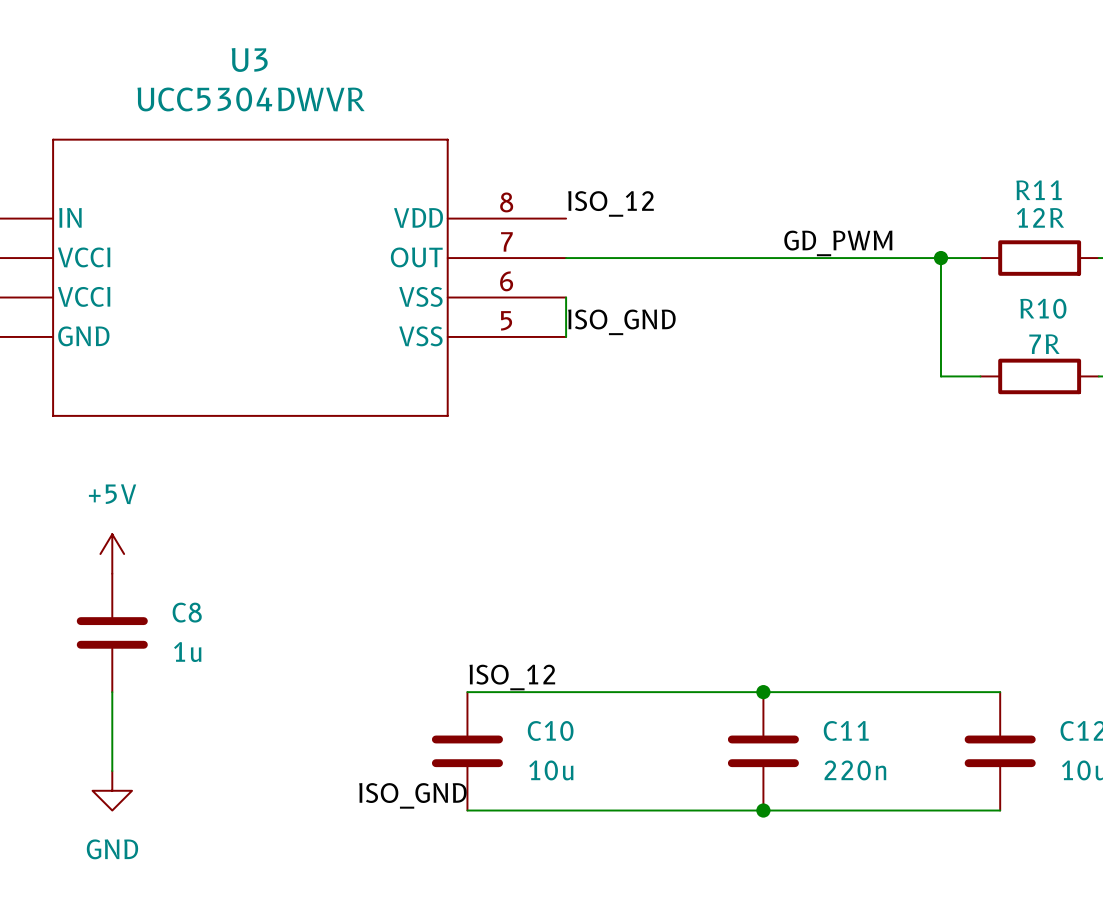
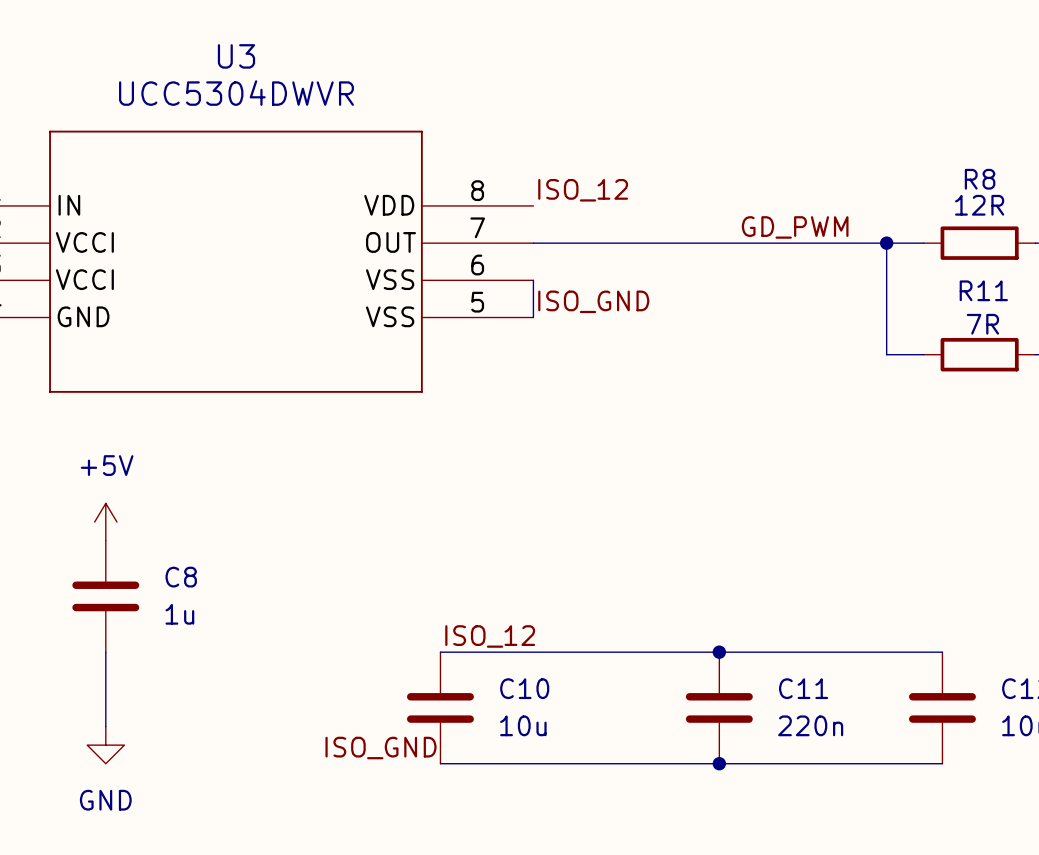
R11 name: R11 (1039, 190) -> R8 (980, 179)
R10 name: R10 (1043, 308) -> R11 (983, 290)

